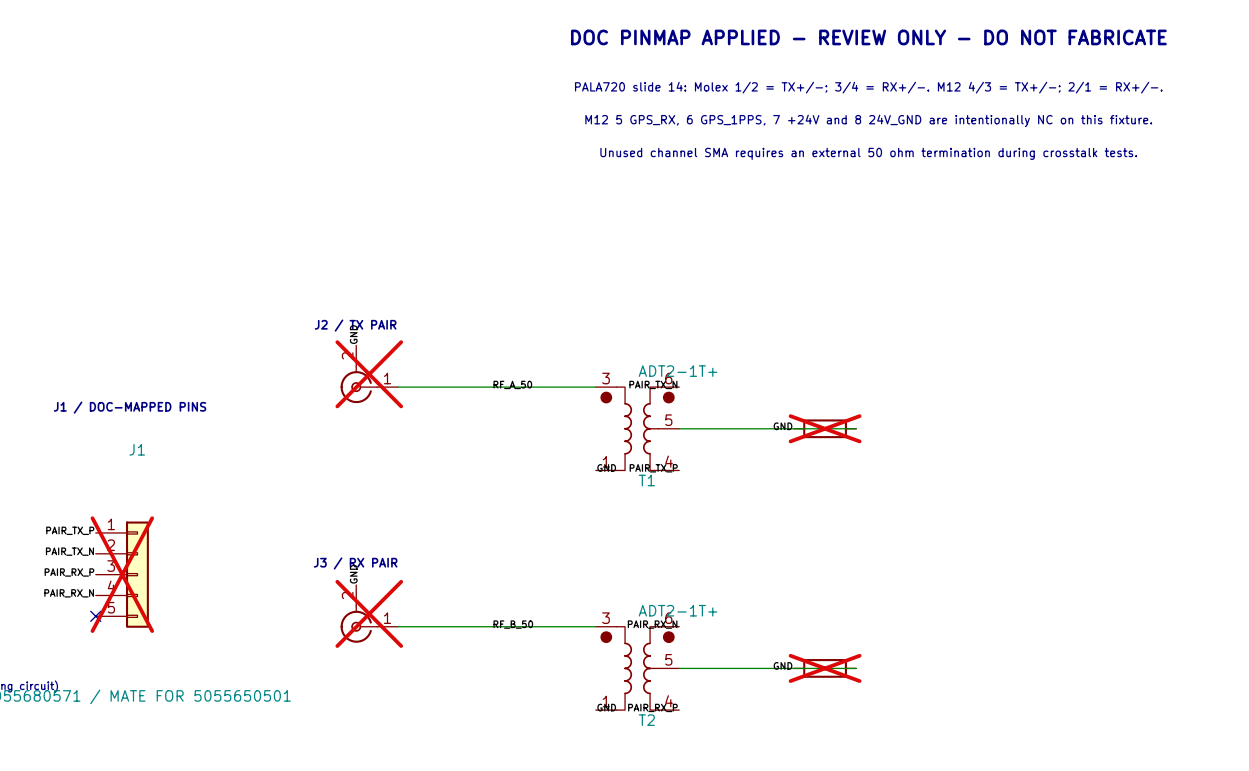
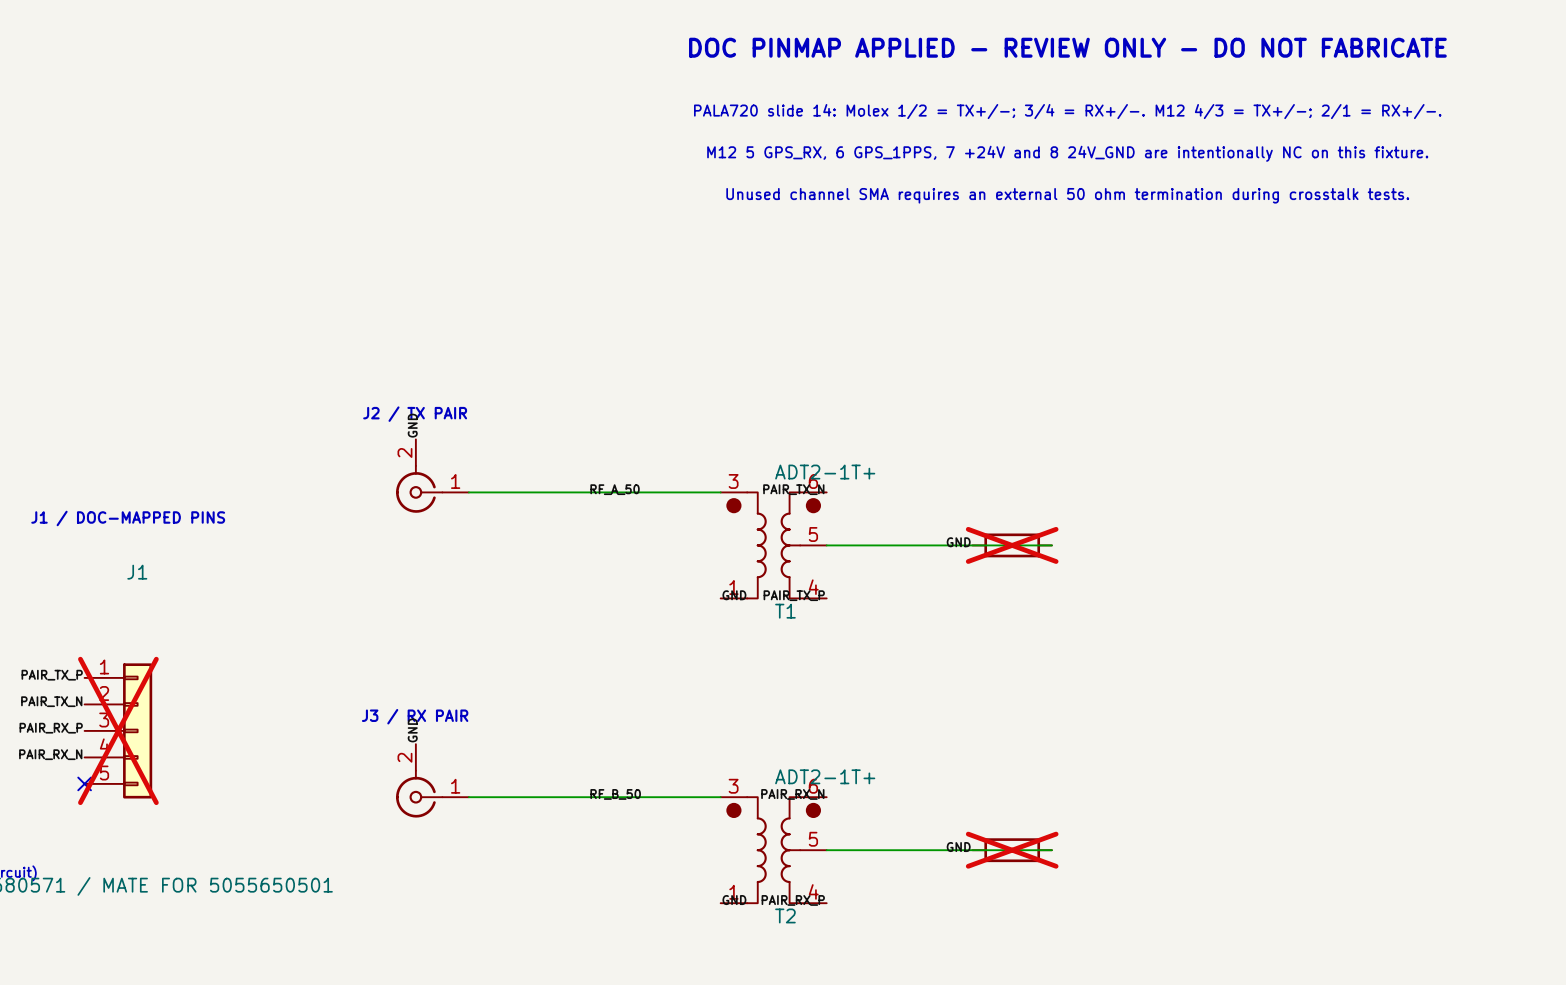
part do-not-place cross: (369, 374) -> none
part do-not-place cross: (369, 613) -> none

